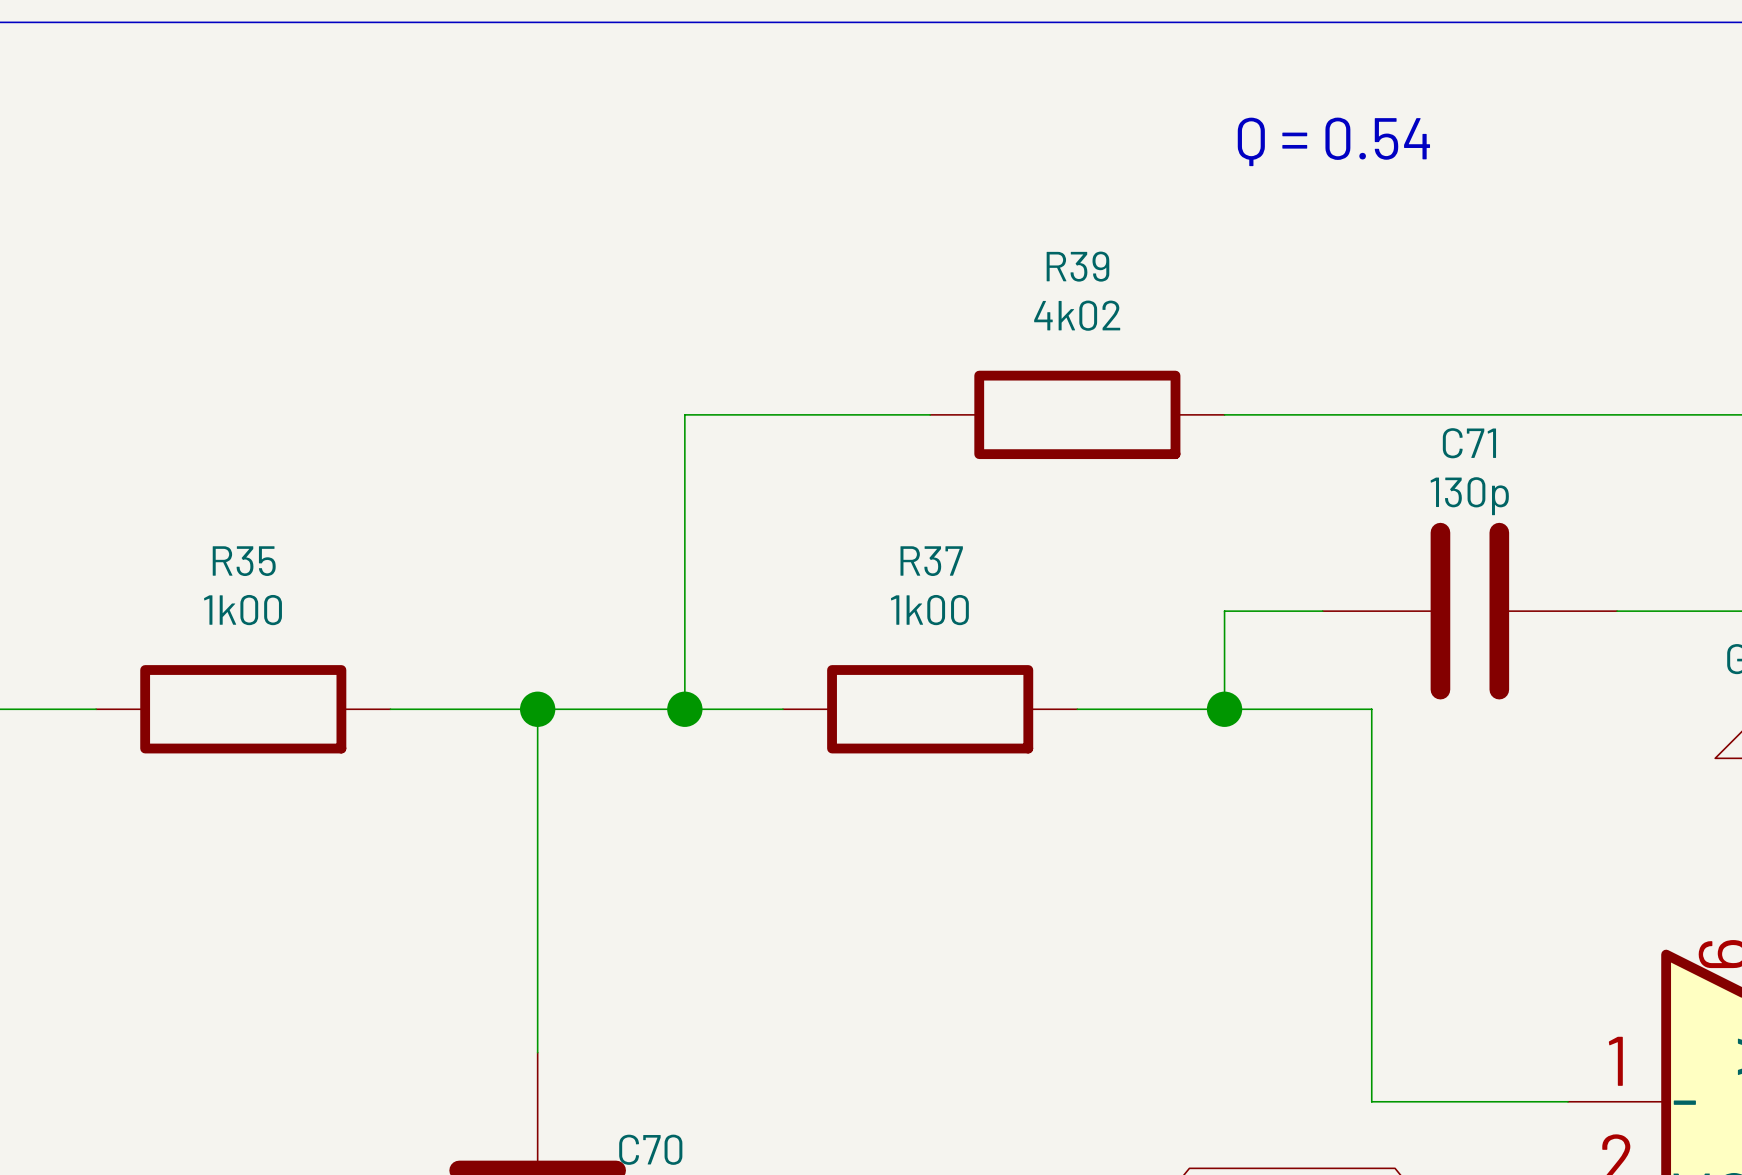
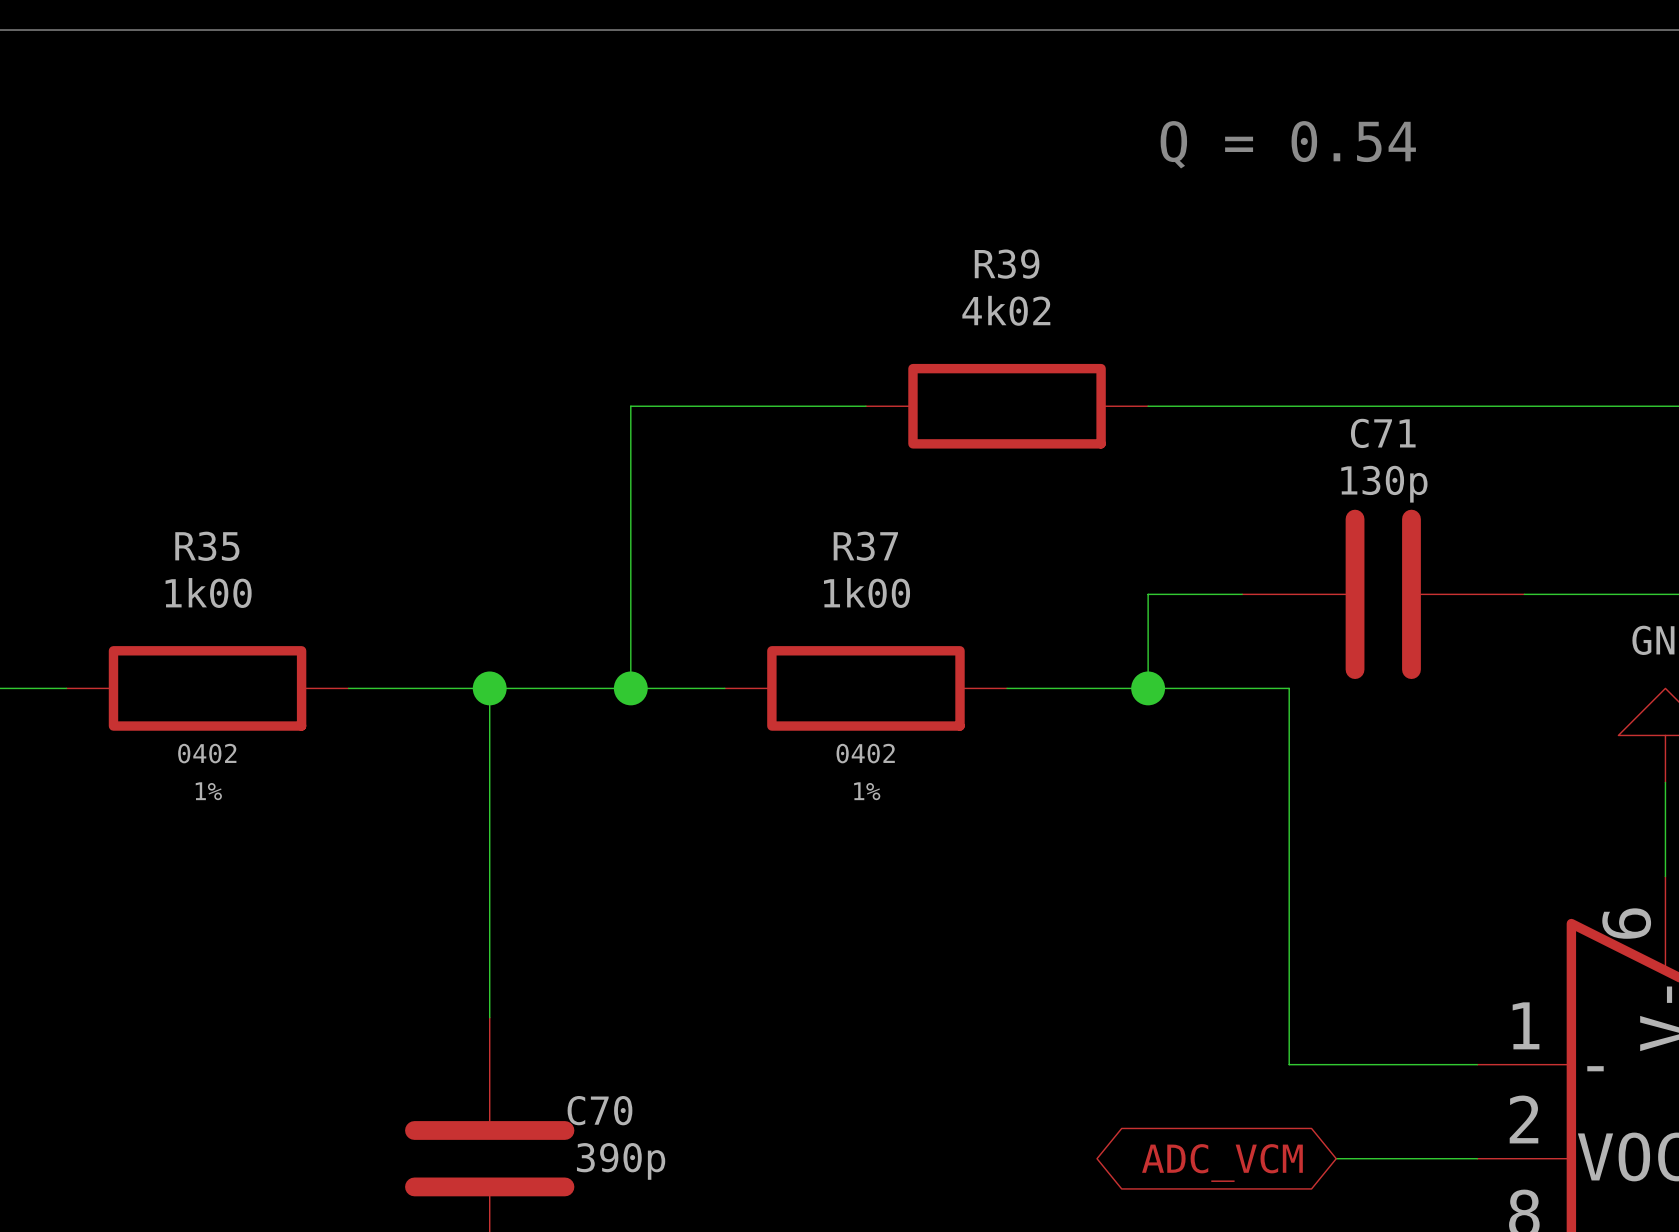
R35 text: none -> 0402 (207, 753)
R37 text: none -> 0402 (865, 753)
R35 text: none -> 1% (208, 791)
R37 text: none -> 1% (867, 791)

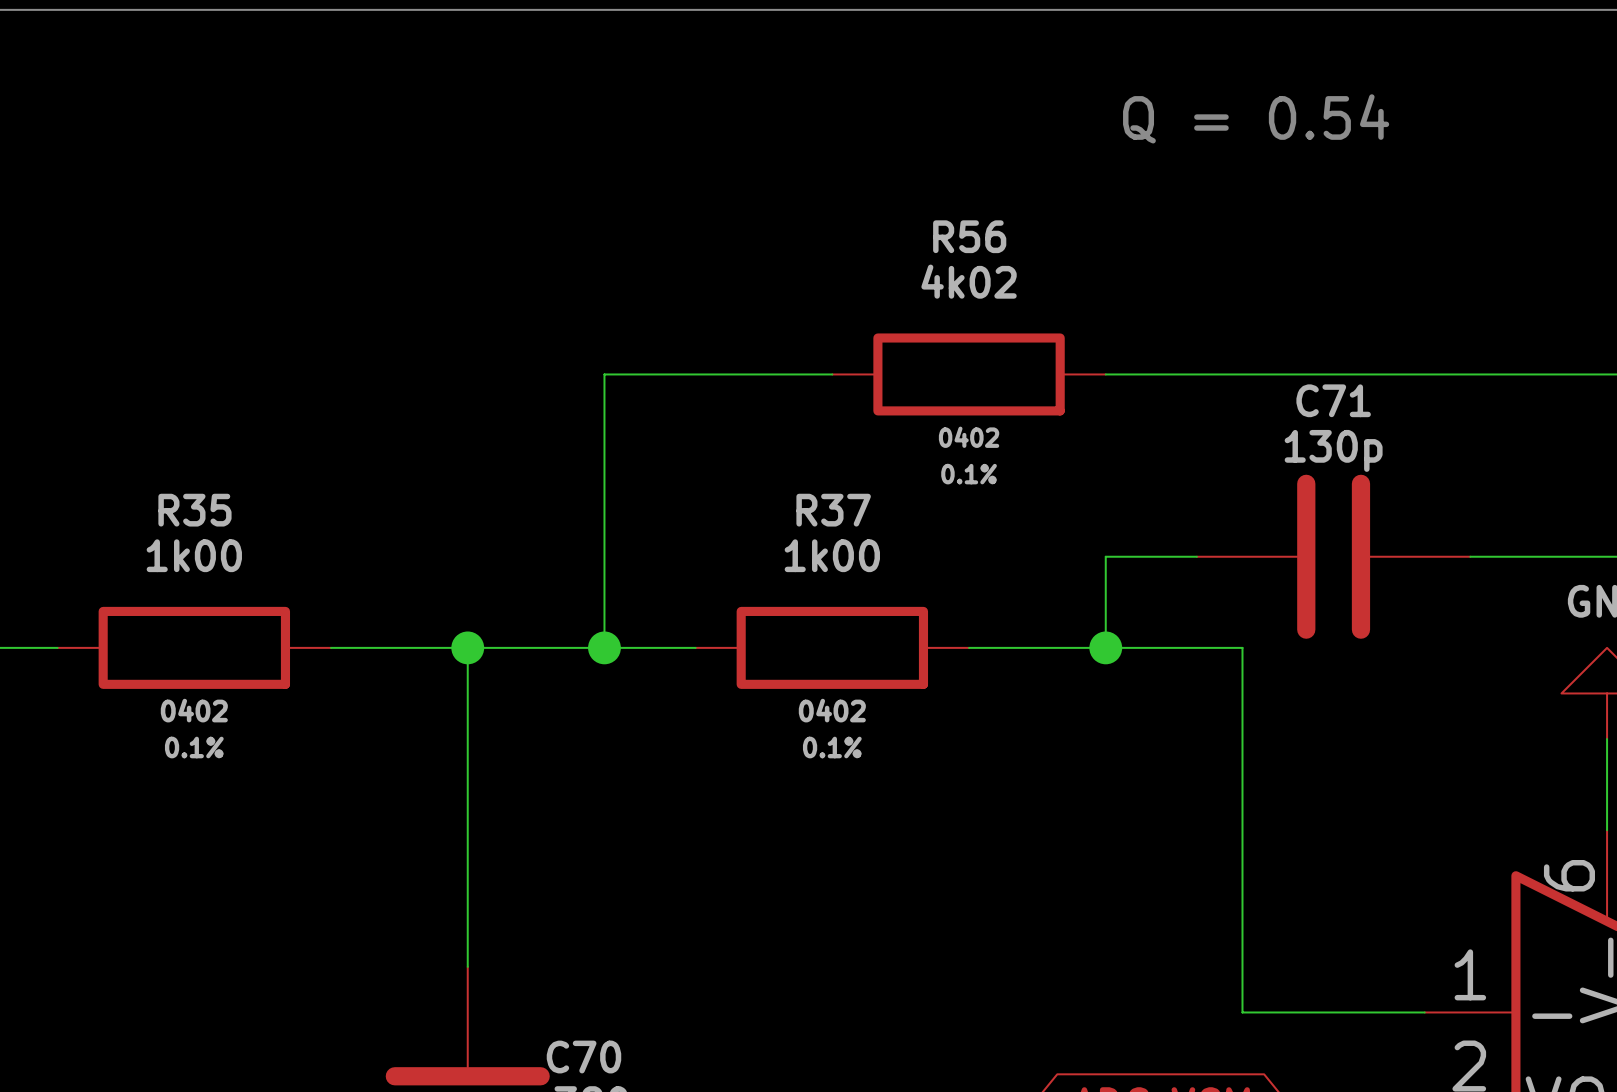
R39 name: R39 (1007, 264) -> R56 (969, 236)
R39 text: none -> 0402 (969, 437)
R39 text: none -> 0.1% (969, 474)
R35 text: 1% (208, 791) -> 0.1% (194, 747)
R37 text: 1% (867, 791) -> 0.1% (832, 747)

